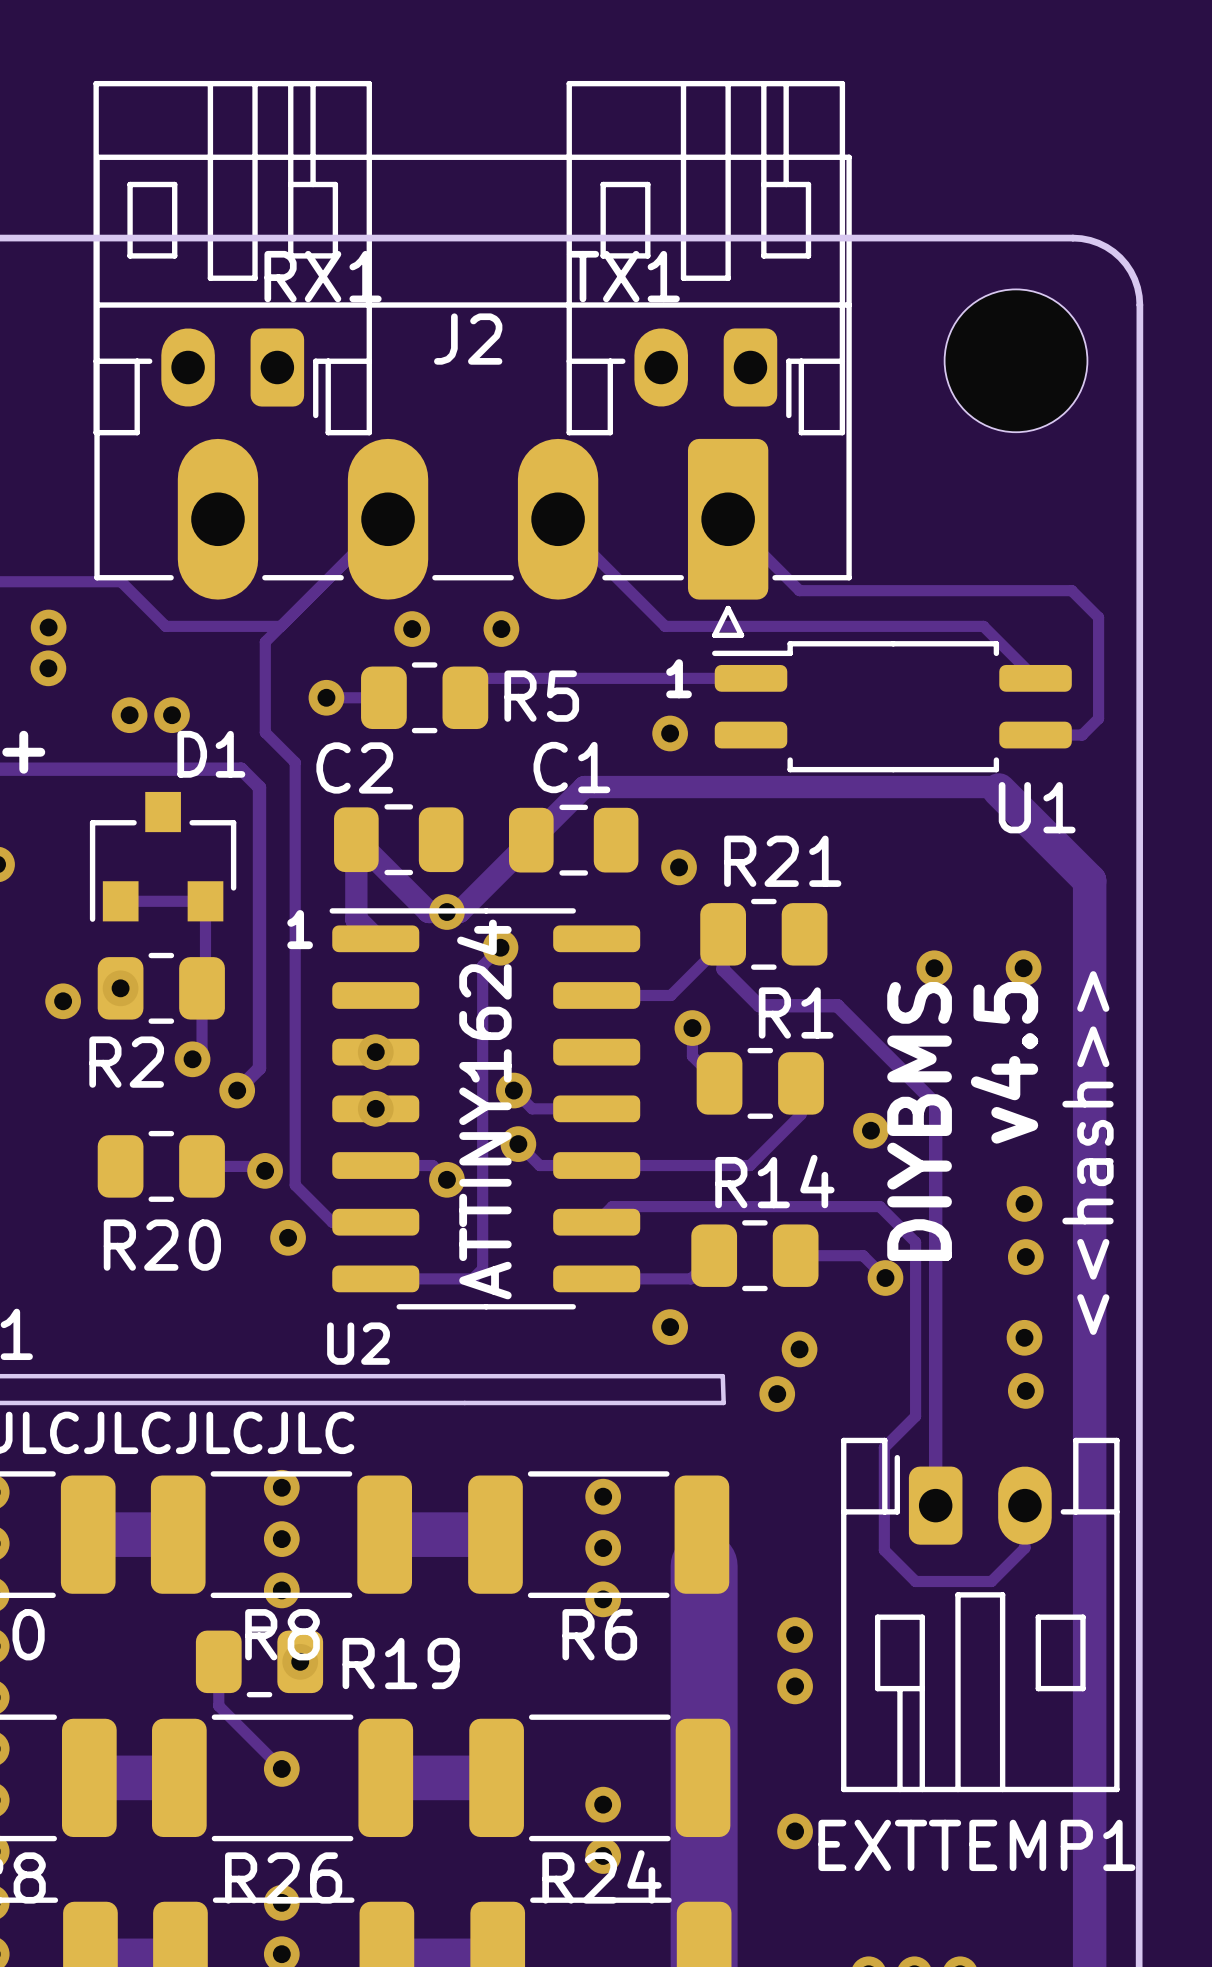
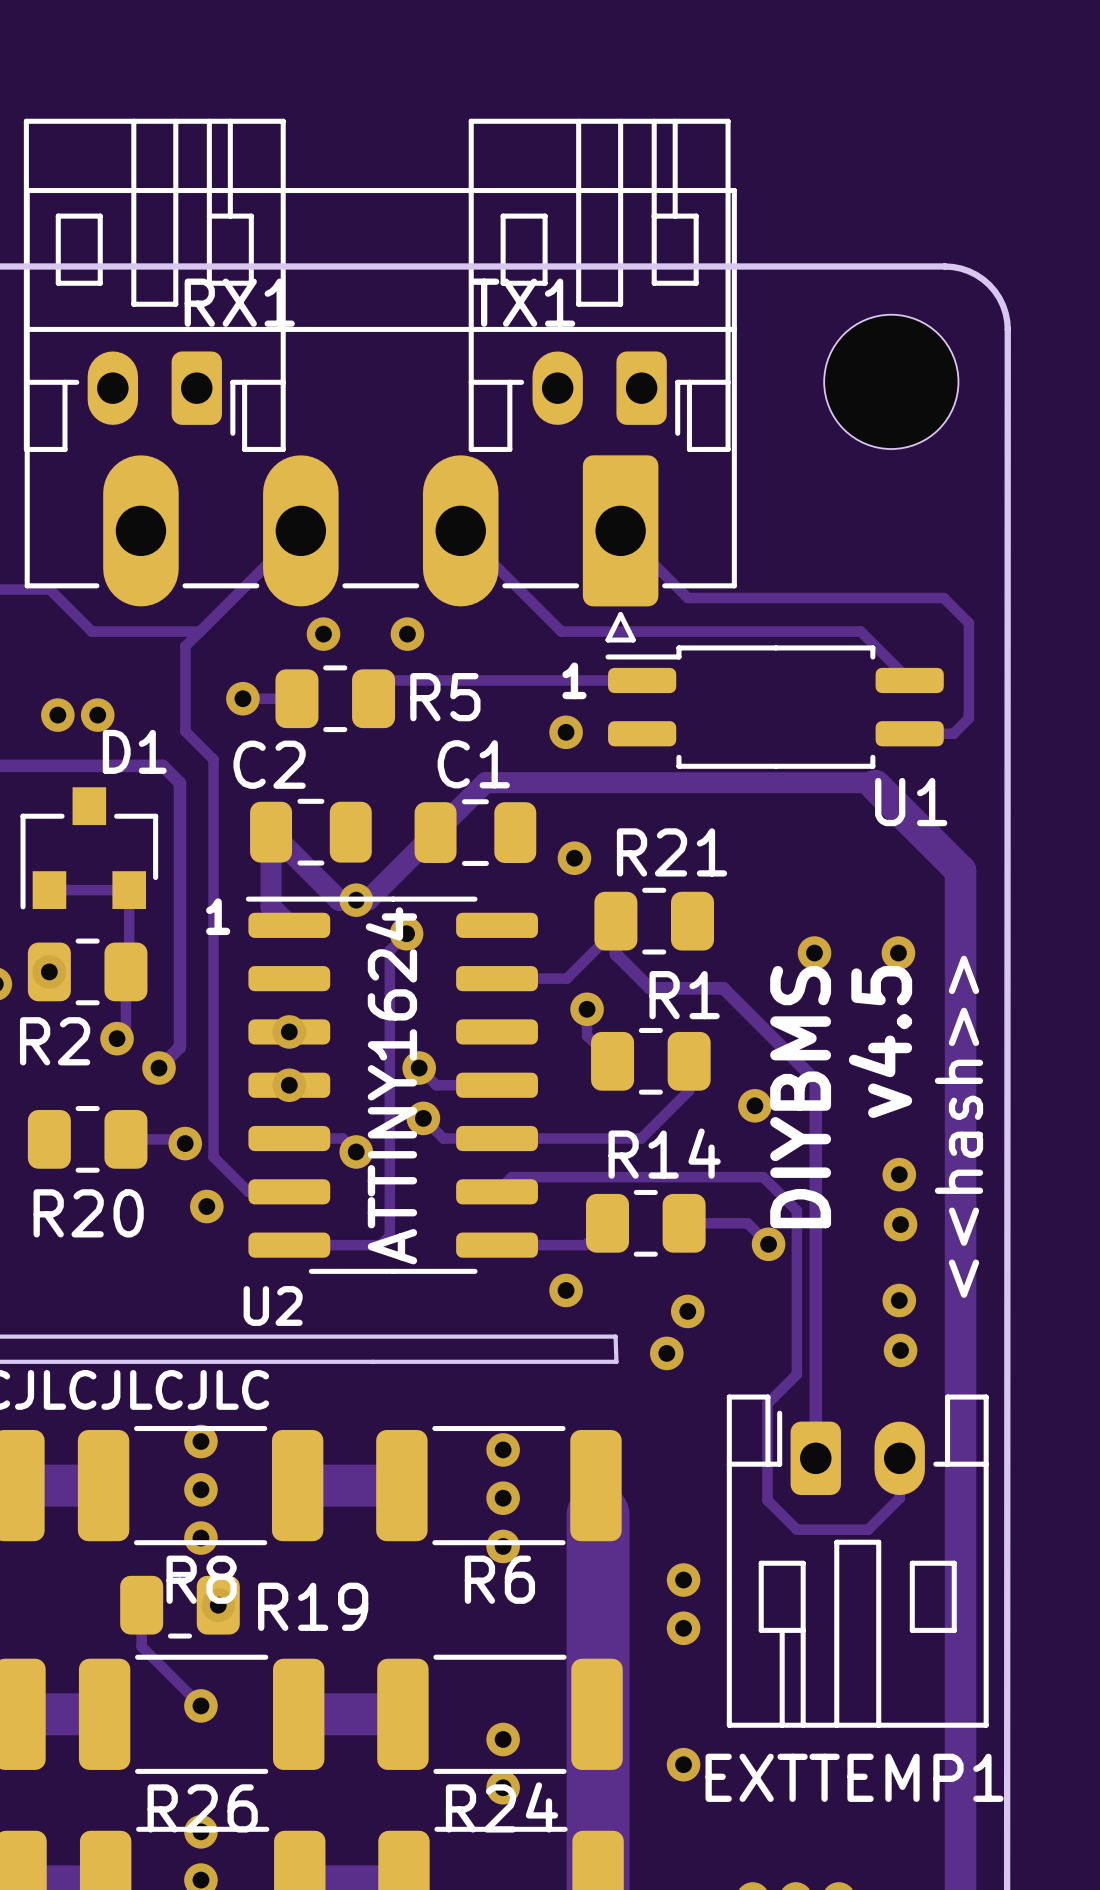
J2 name: J2 (468, 339) -> none

